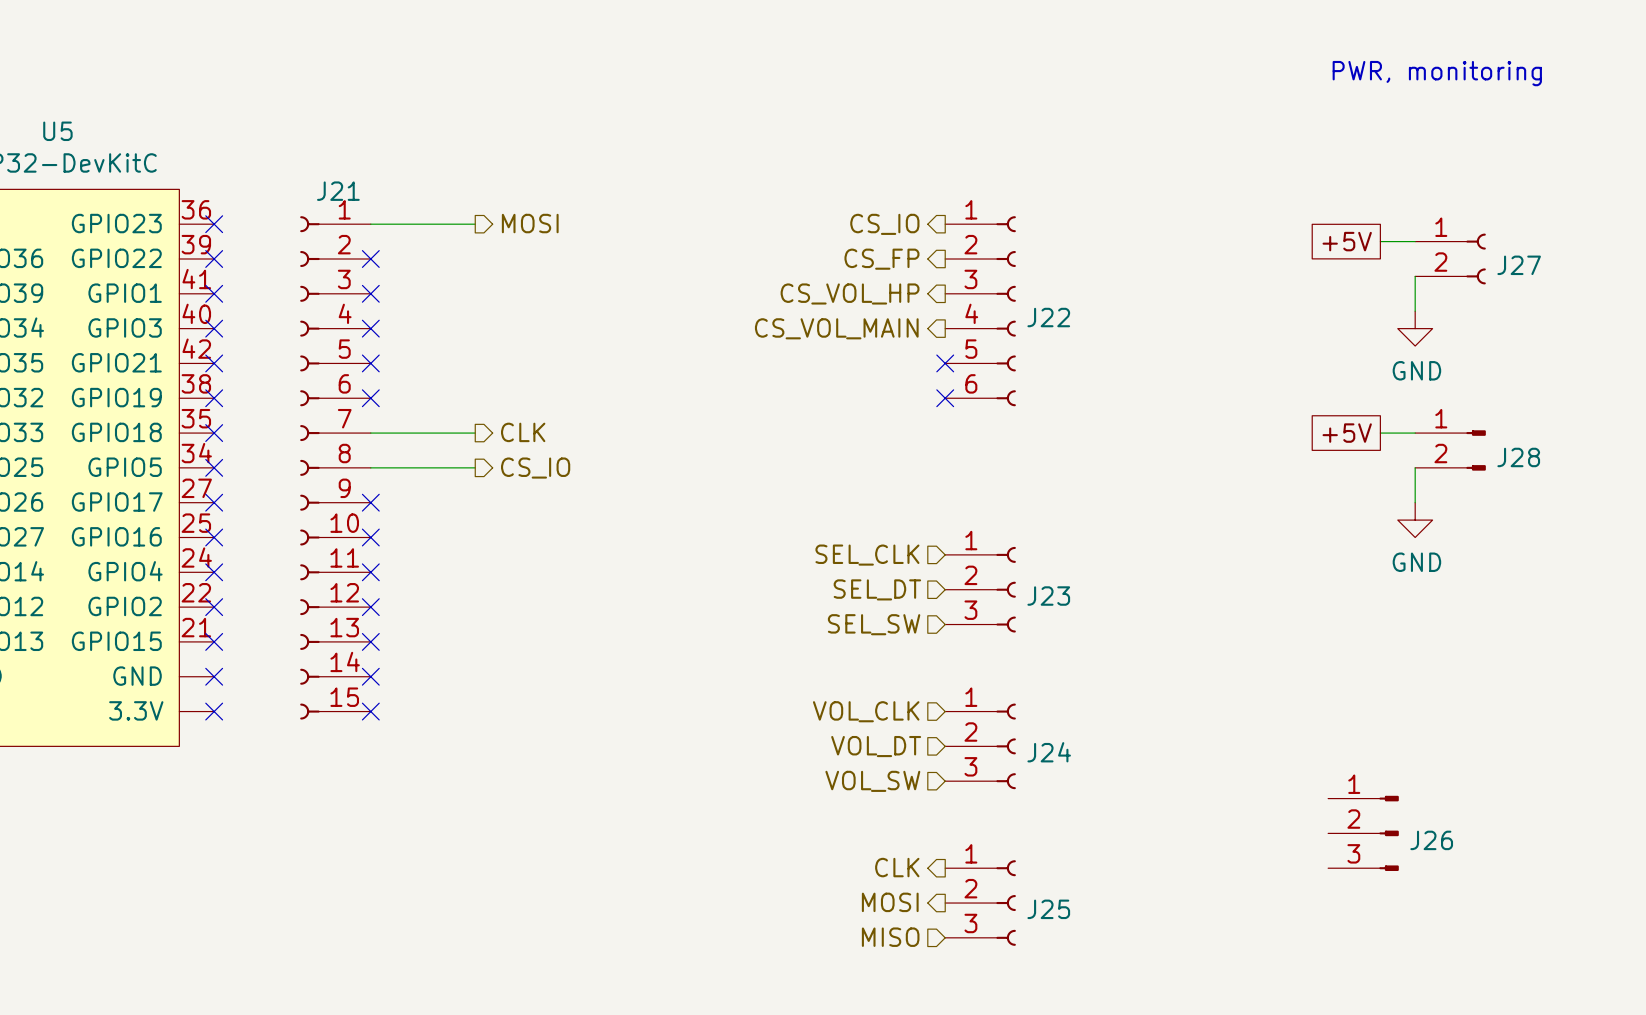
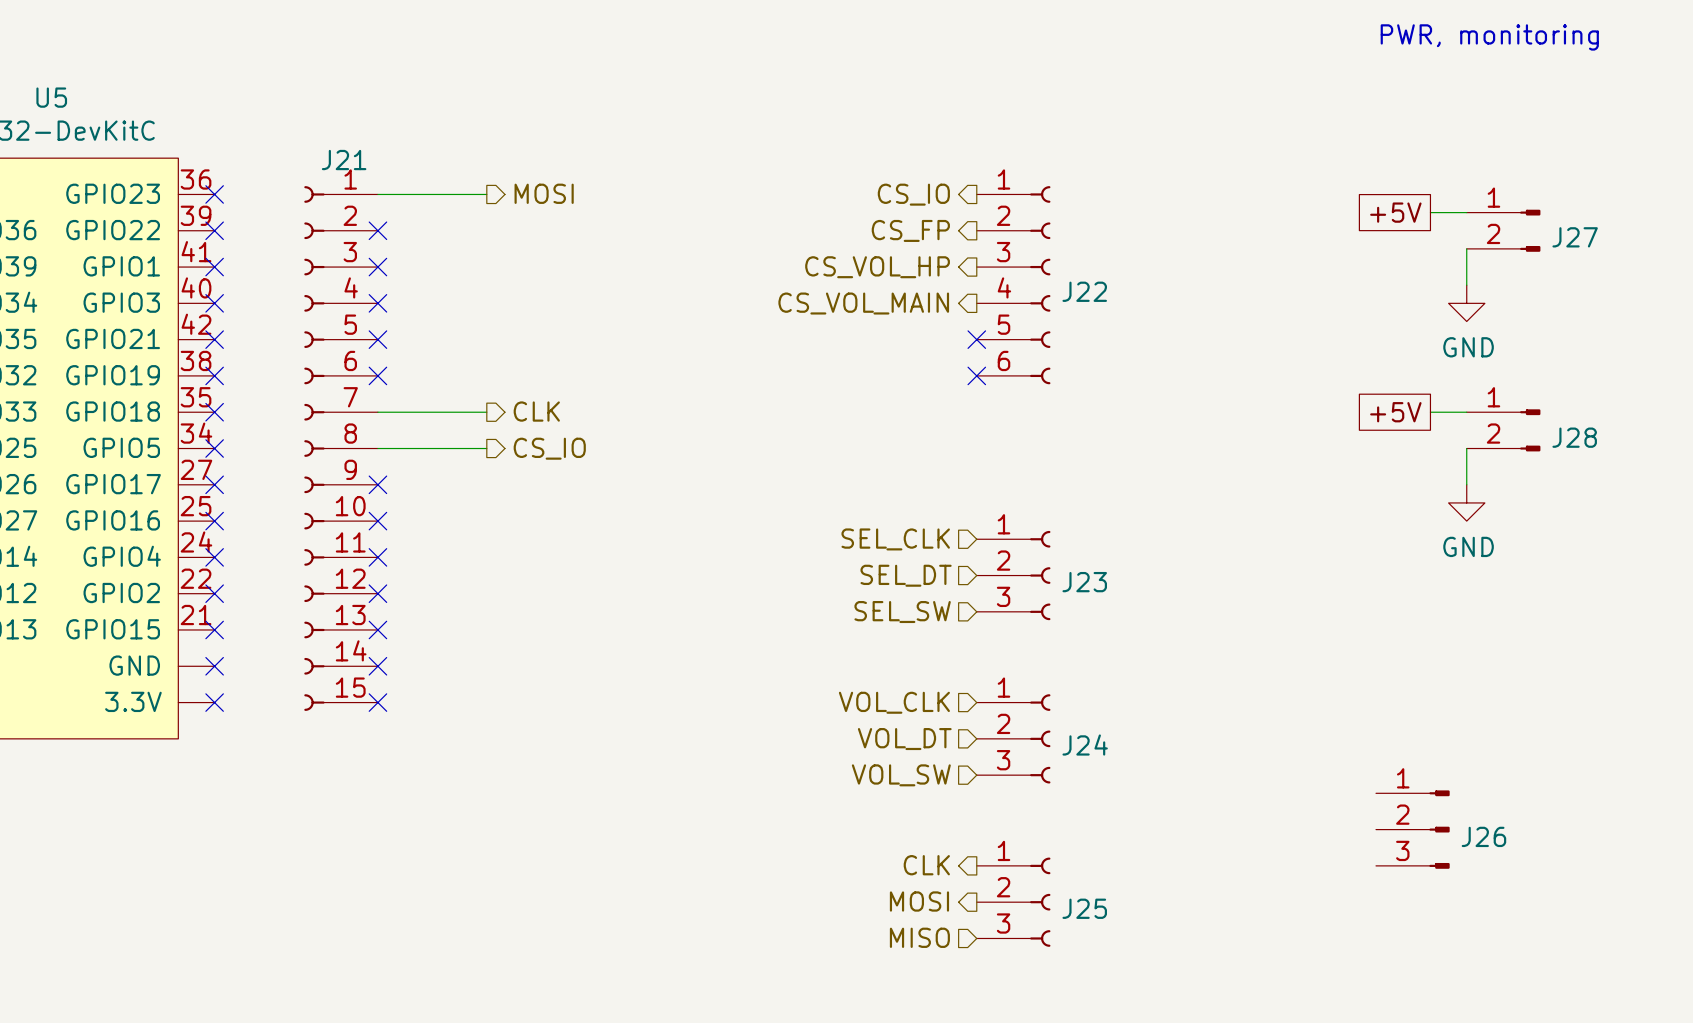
J27 symbol: [1415, 233, 1486, 285] -> [1466, 209, 1541, 252]

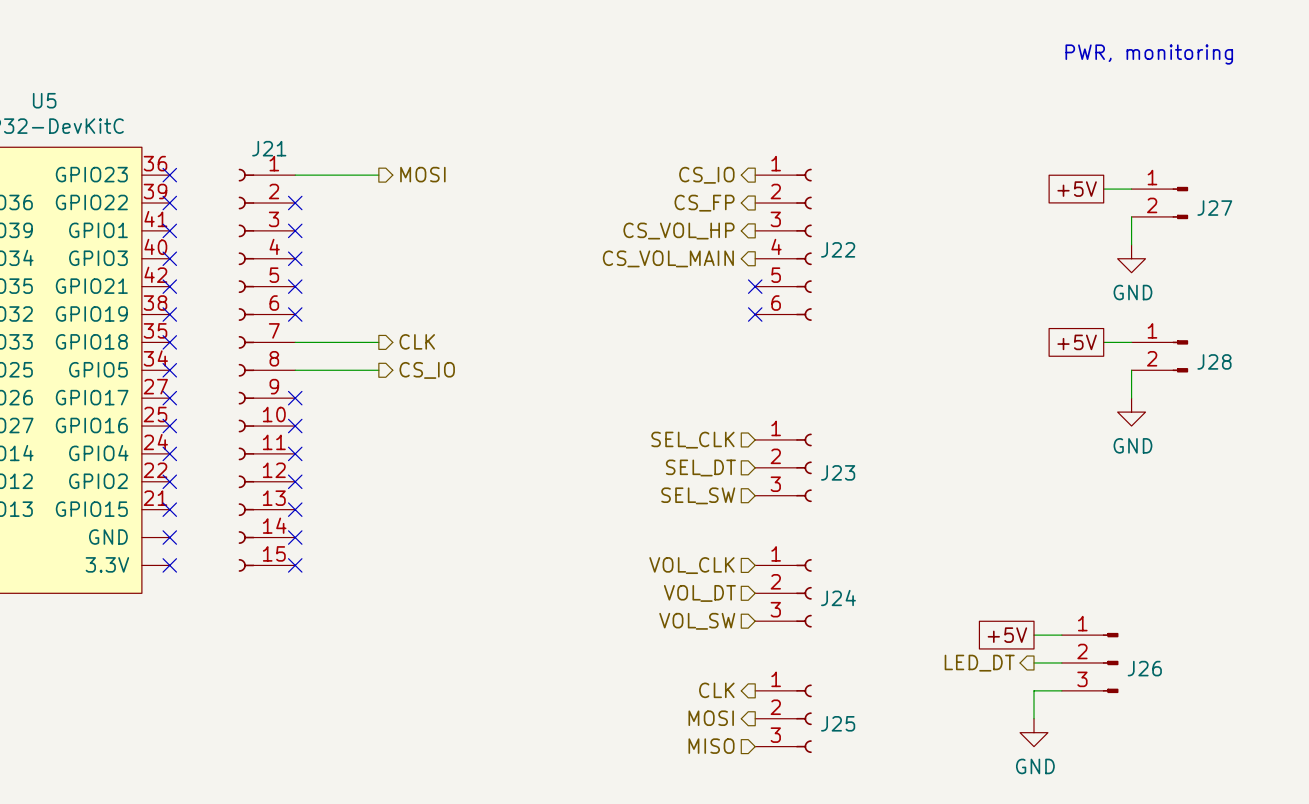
global label: none -> +5V (1007, 635)
wire: none -> (1034, 635) (1061, 635)
hierarchical label: none -> LED_DT (979, 663)
wire: none -> (1034, 662) (1061, 662)
wire: none -> (1061, 690) (1034, 690) (1034, 718)
power symbol: none -> GND (1034, 732)

